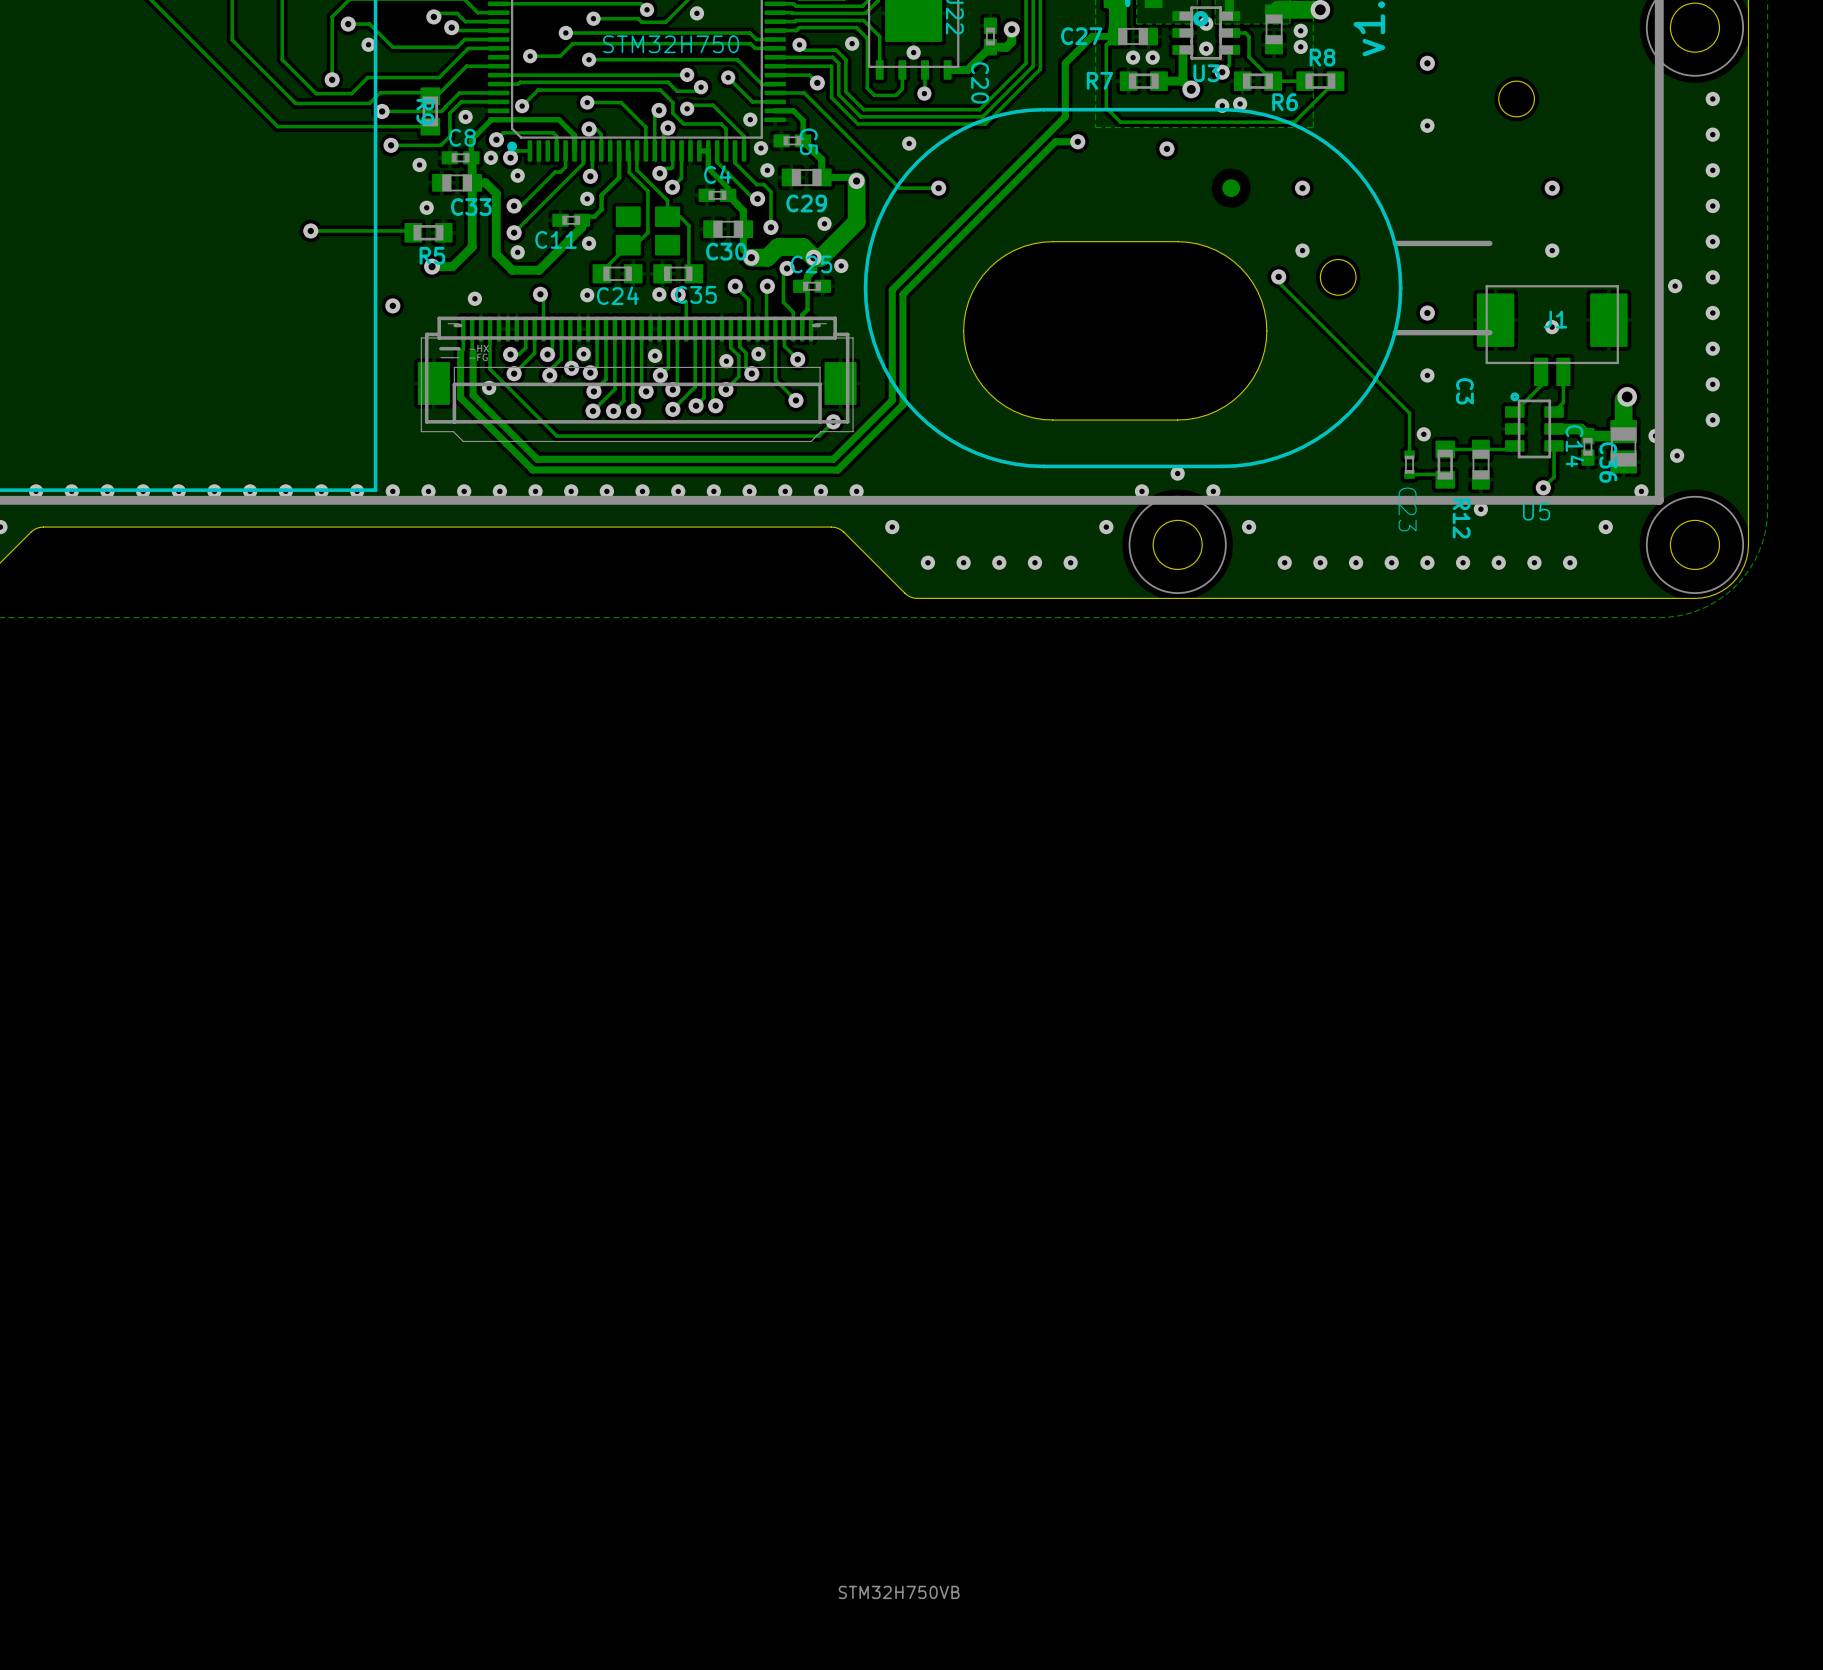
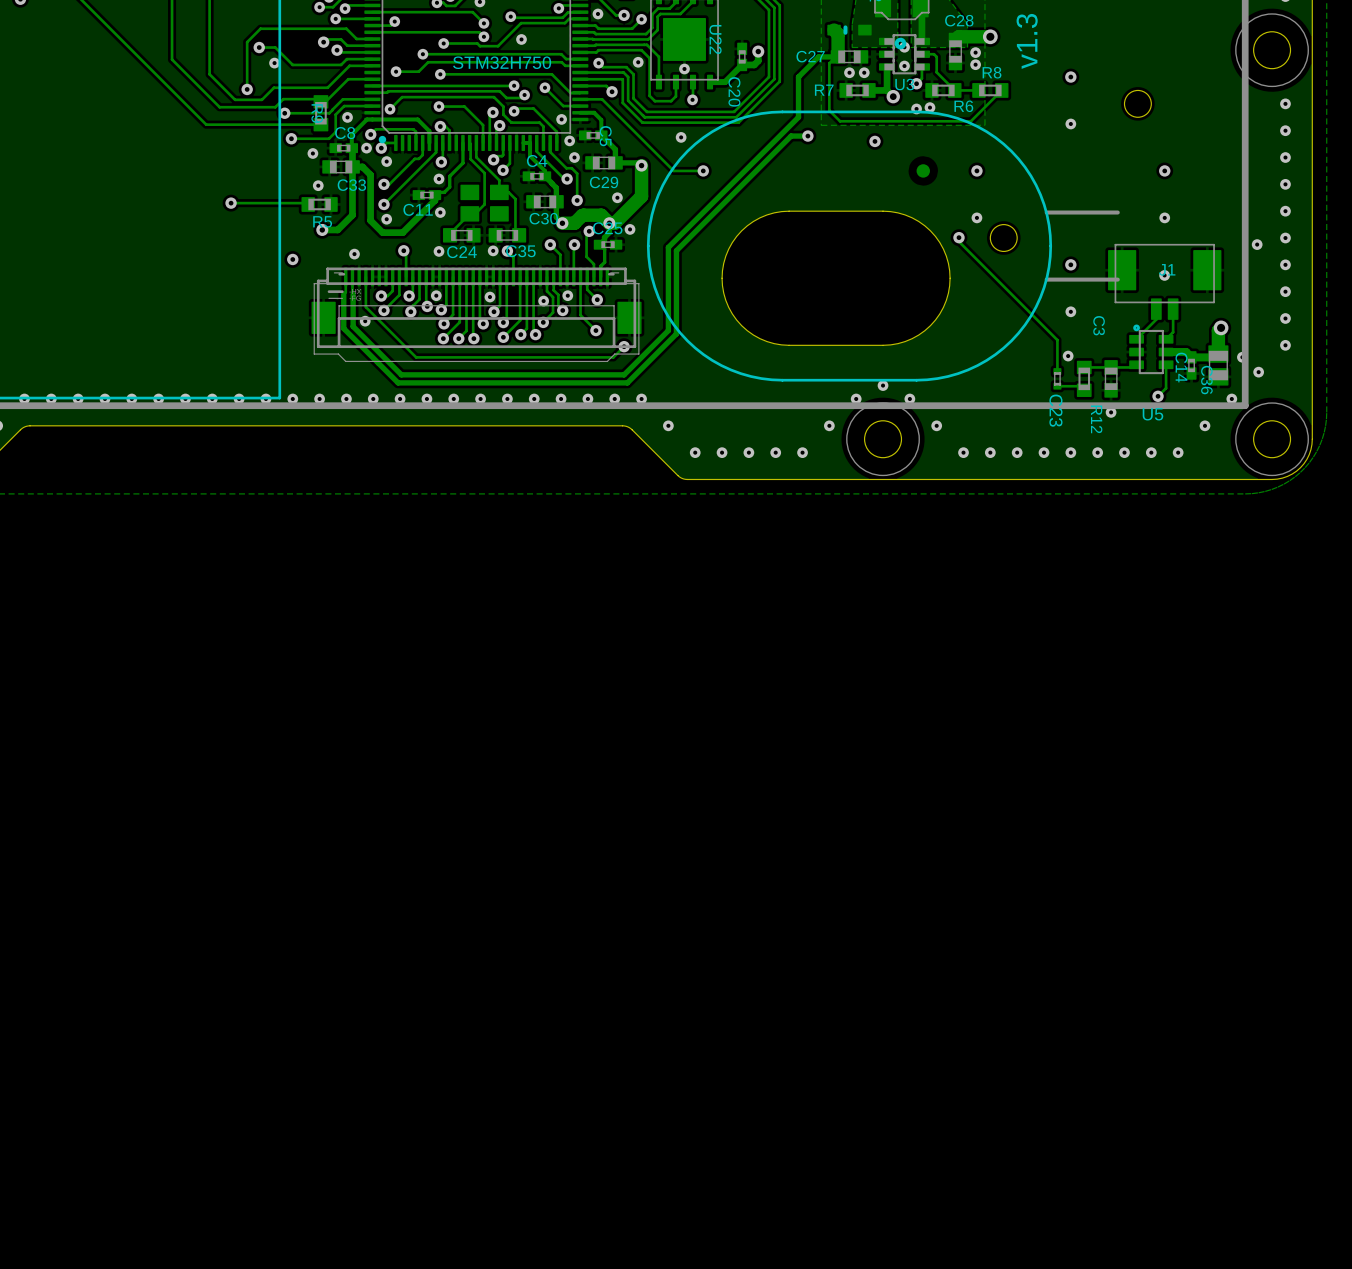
STM32H750 value: STM32H750VB (899, 1592) -> none

